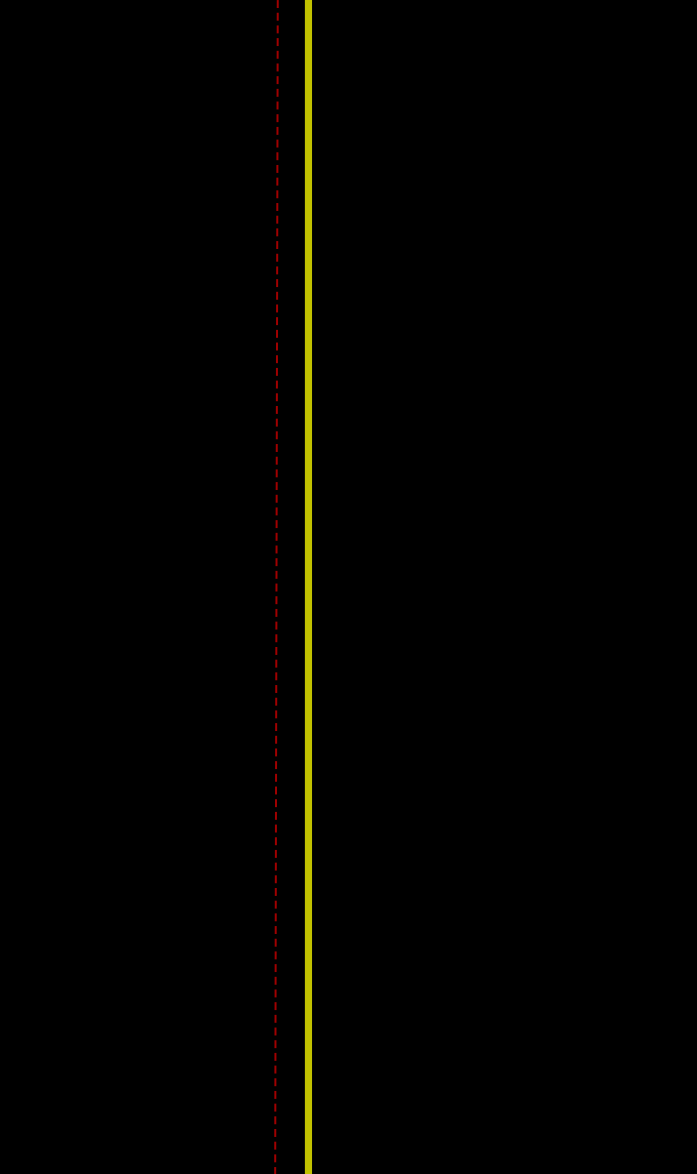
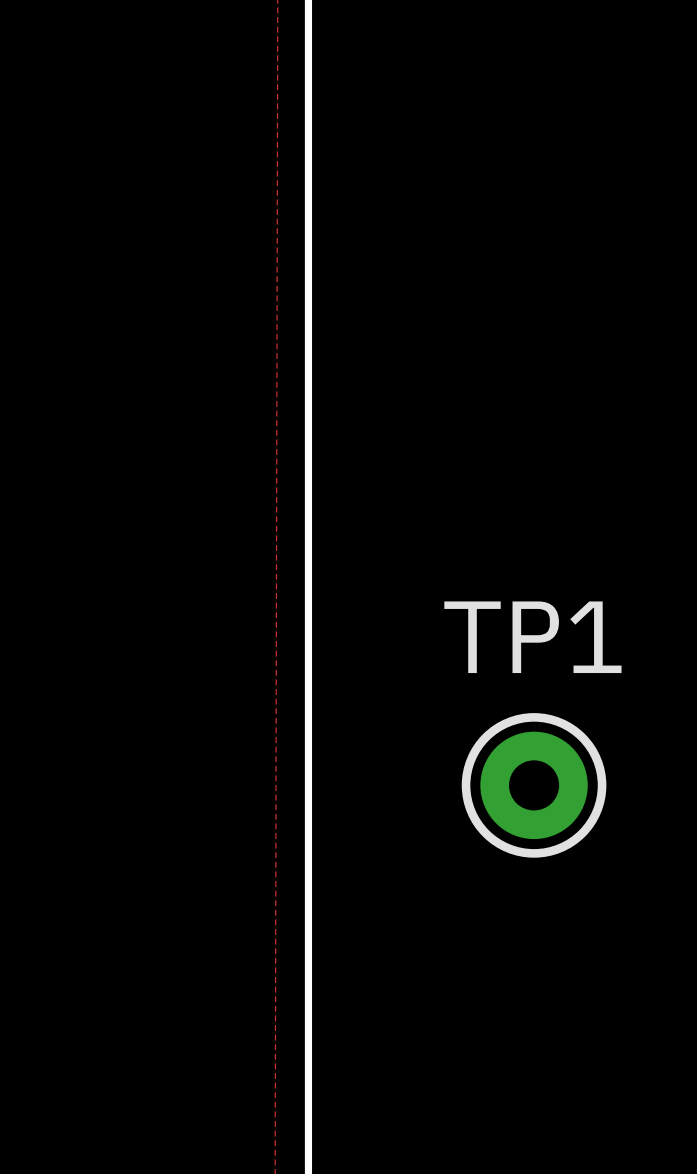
TP1: none -> (534, 785)

